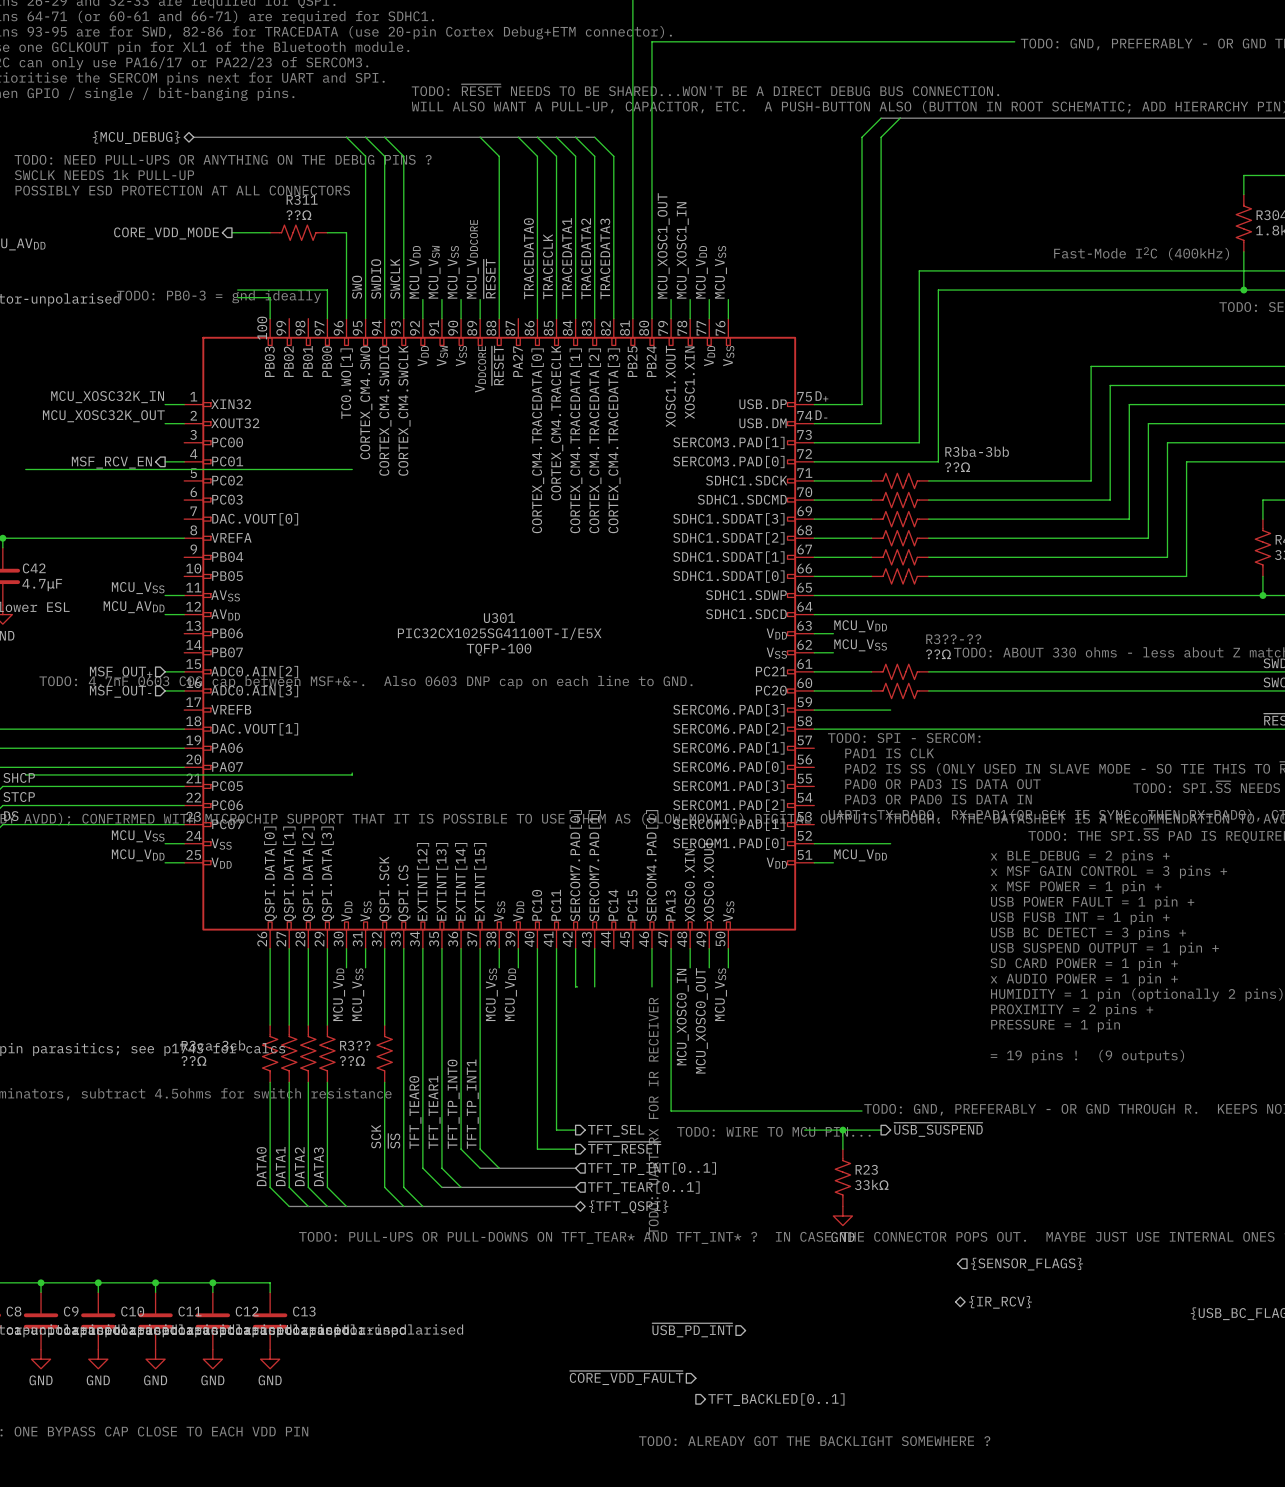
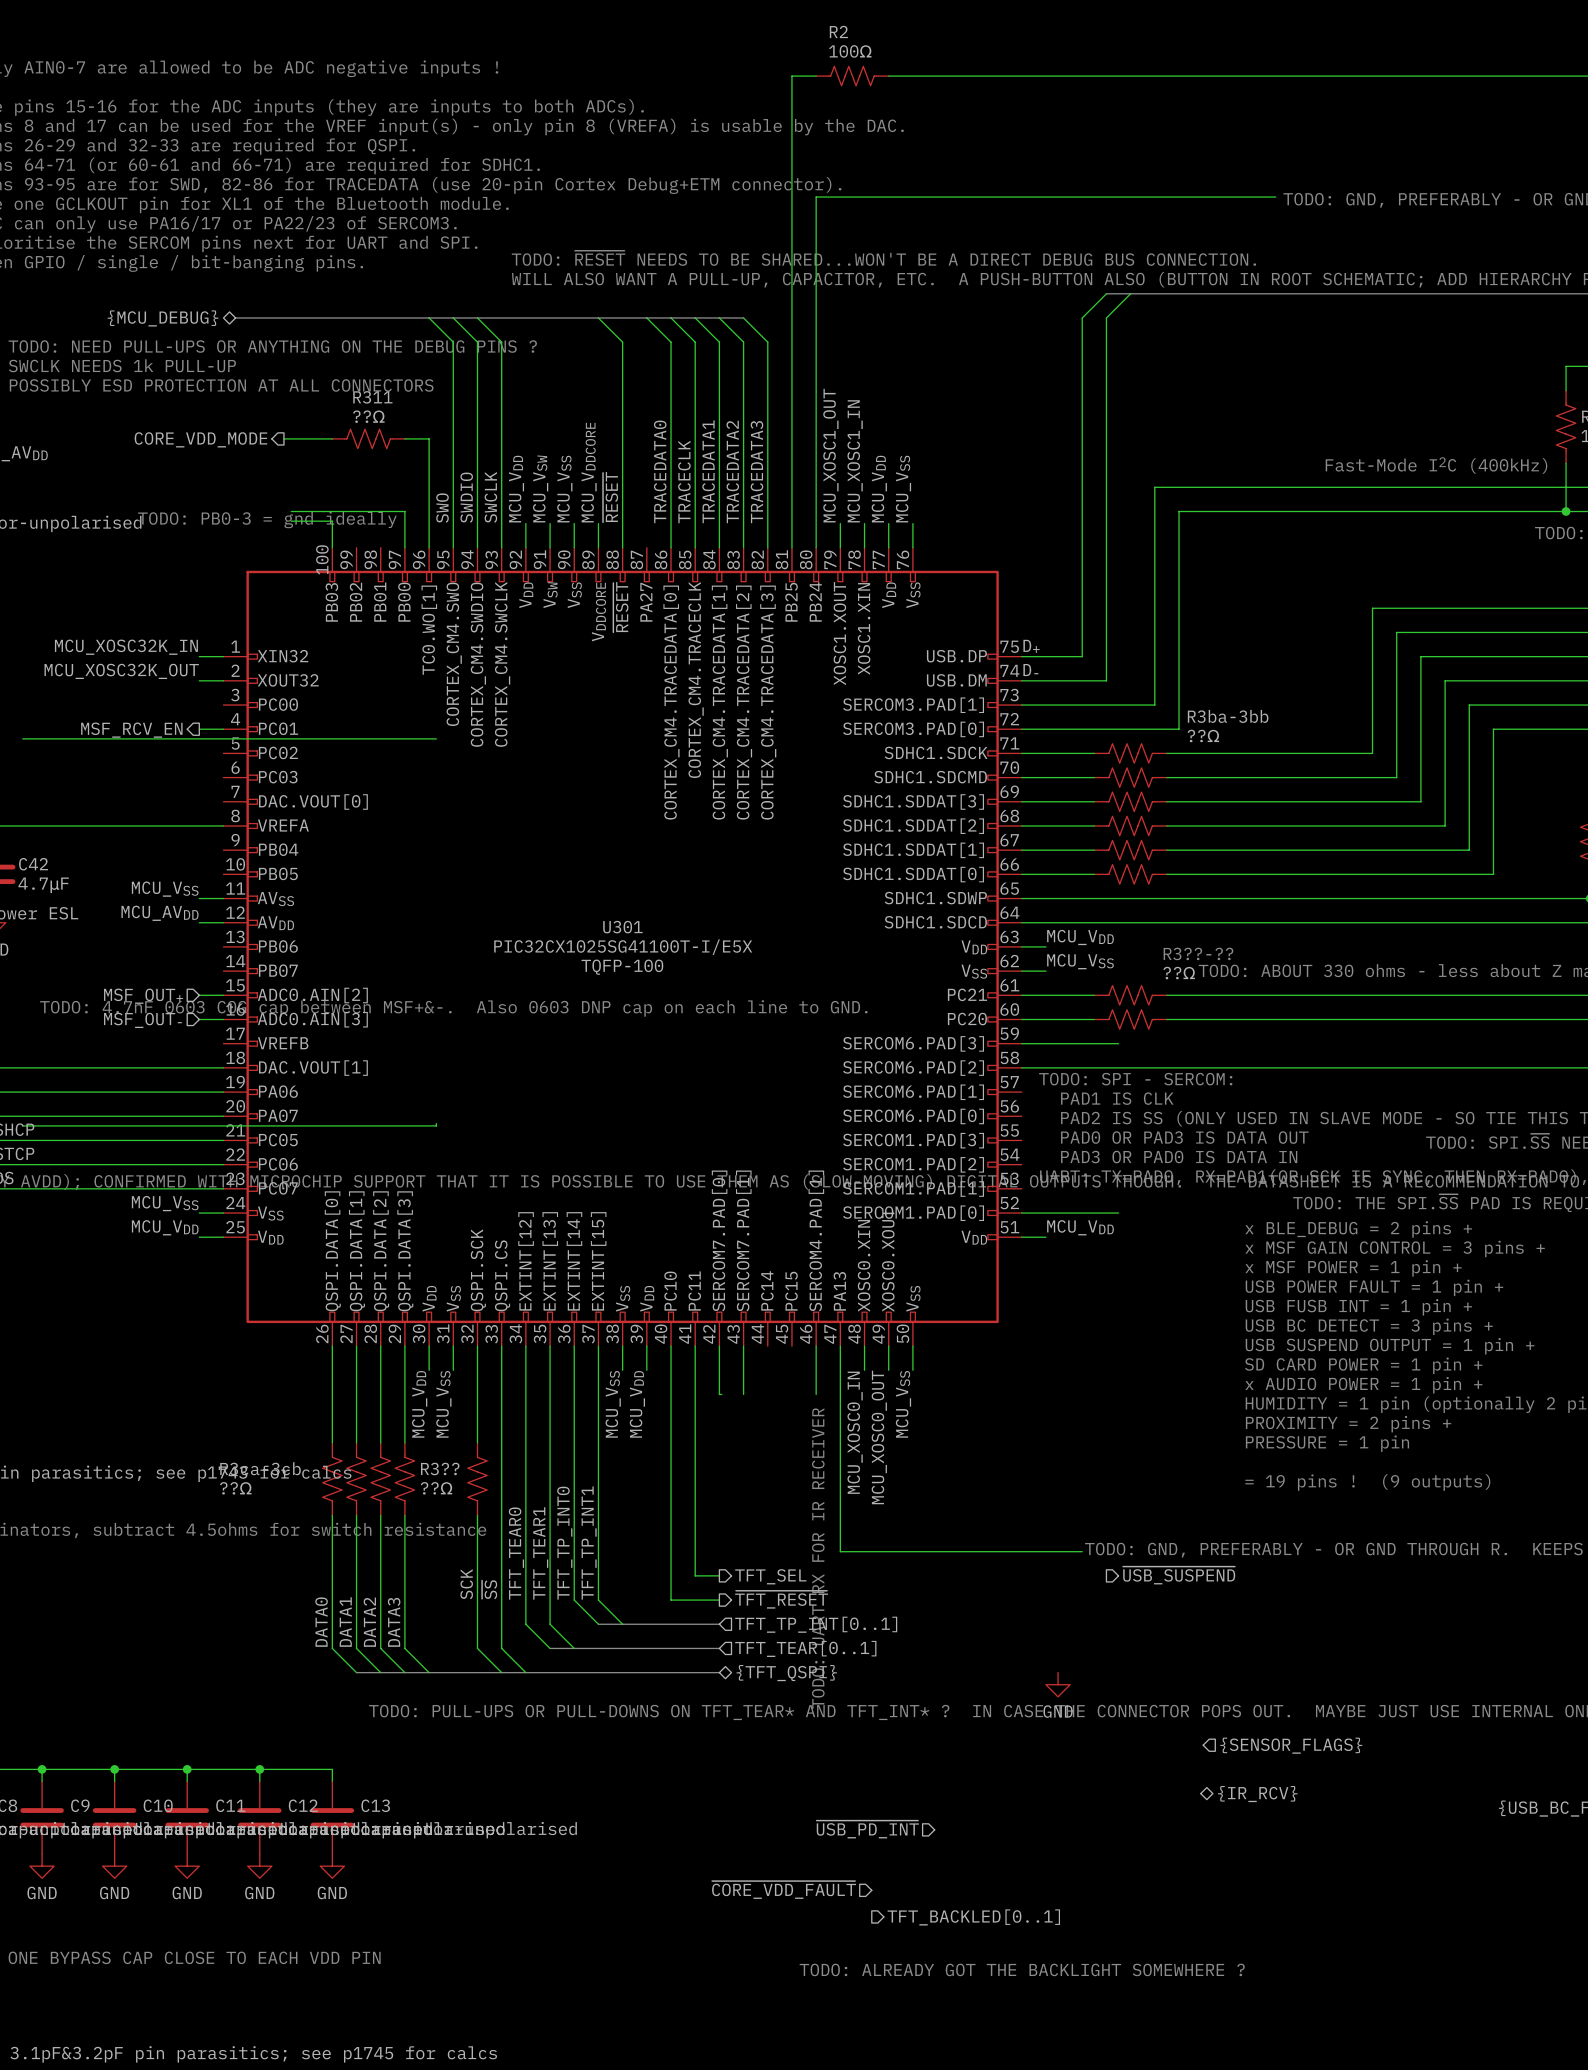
wire: (804, 1130) (881, 1130) -> none
wire: (842, 1130) (842, 1149) -> none
junction: (842, 1130) -> none
text: TODO: WIRE TO MCU PIN... (773, 1131) -> none
R23: 33kΩ (842, 1177) -> none

